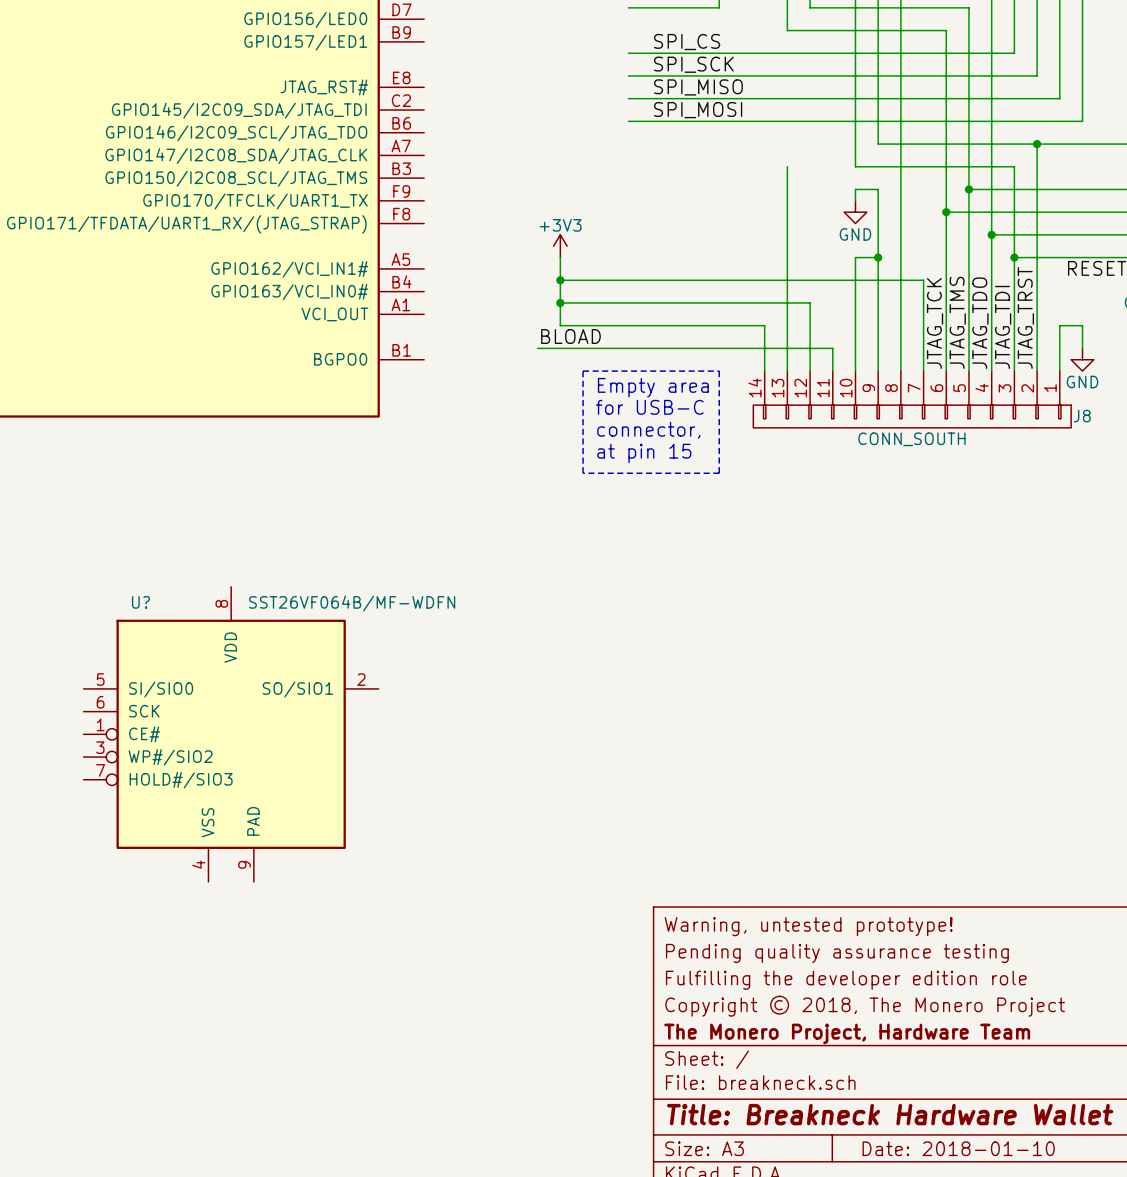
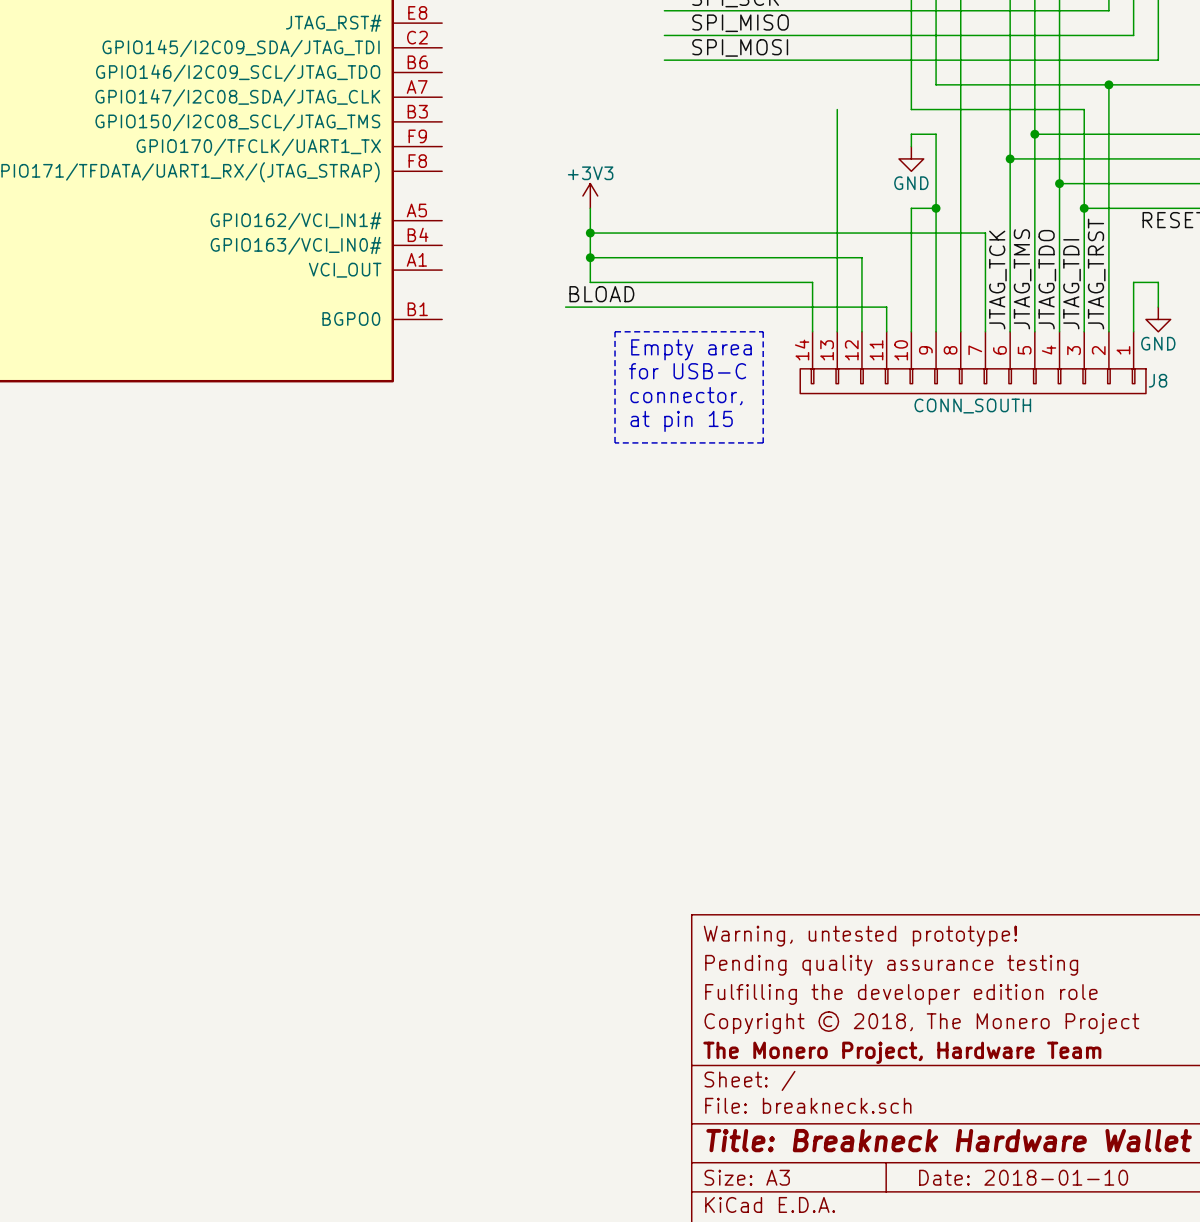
U?: SST26VF064B/MF-WDFN (231, 734) -> none

